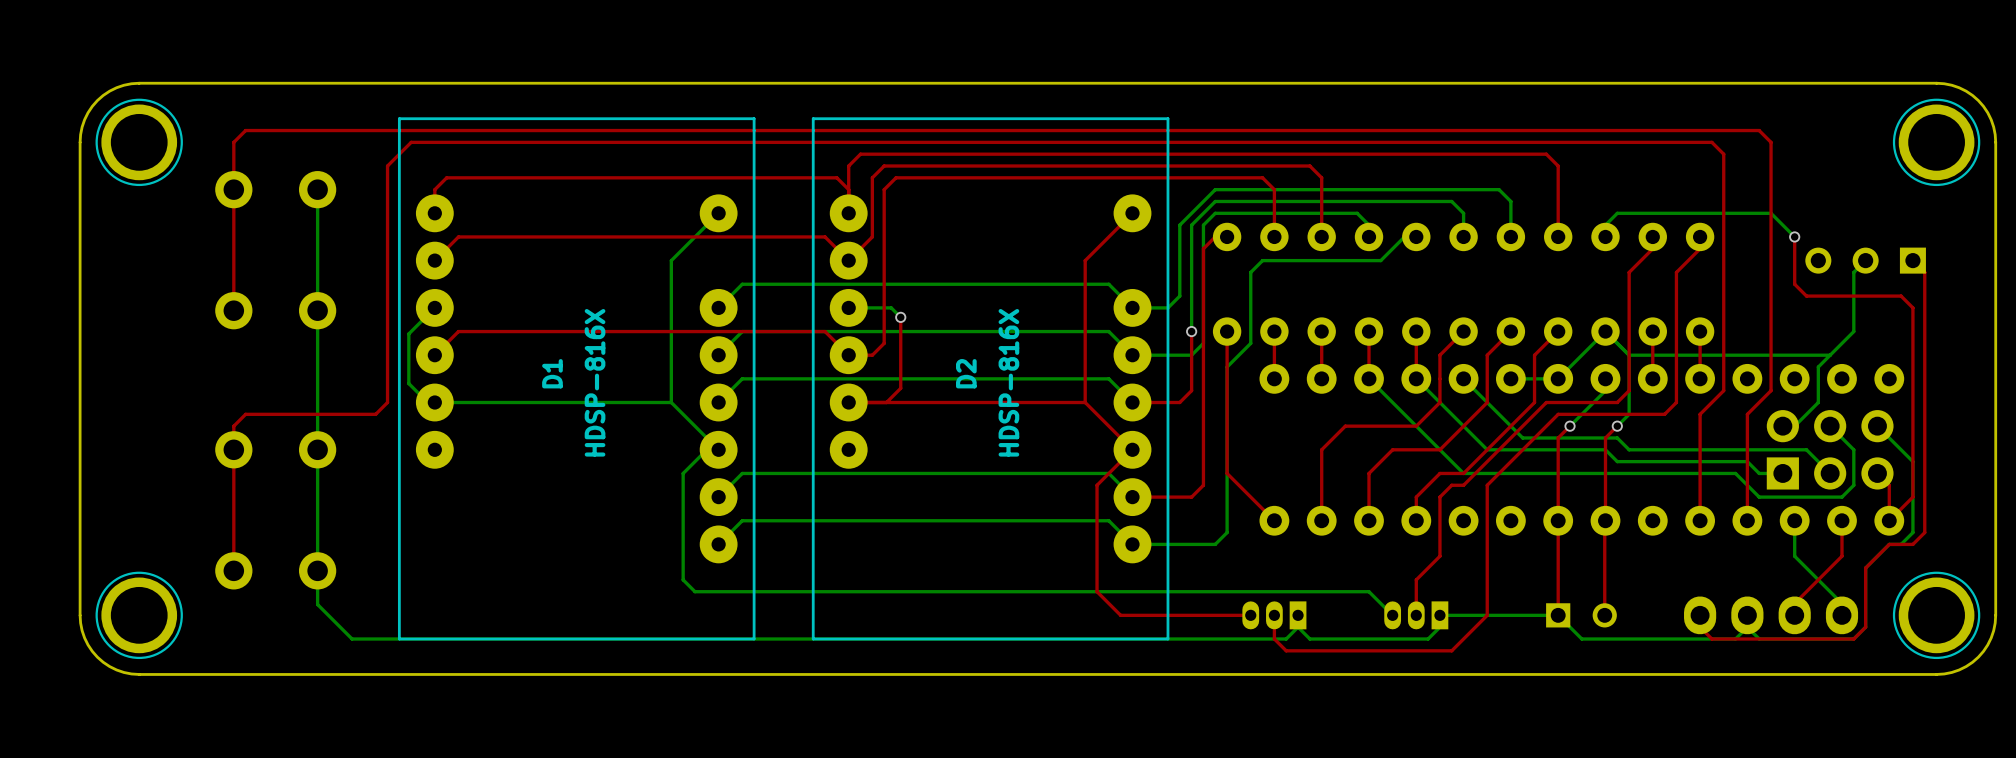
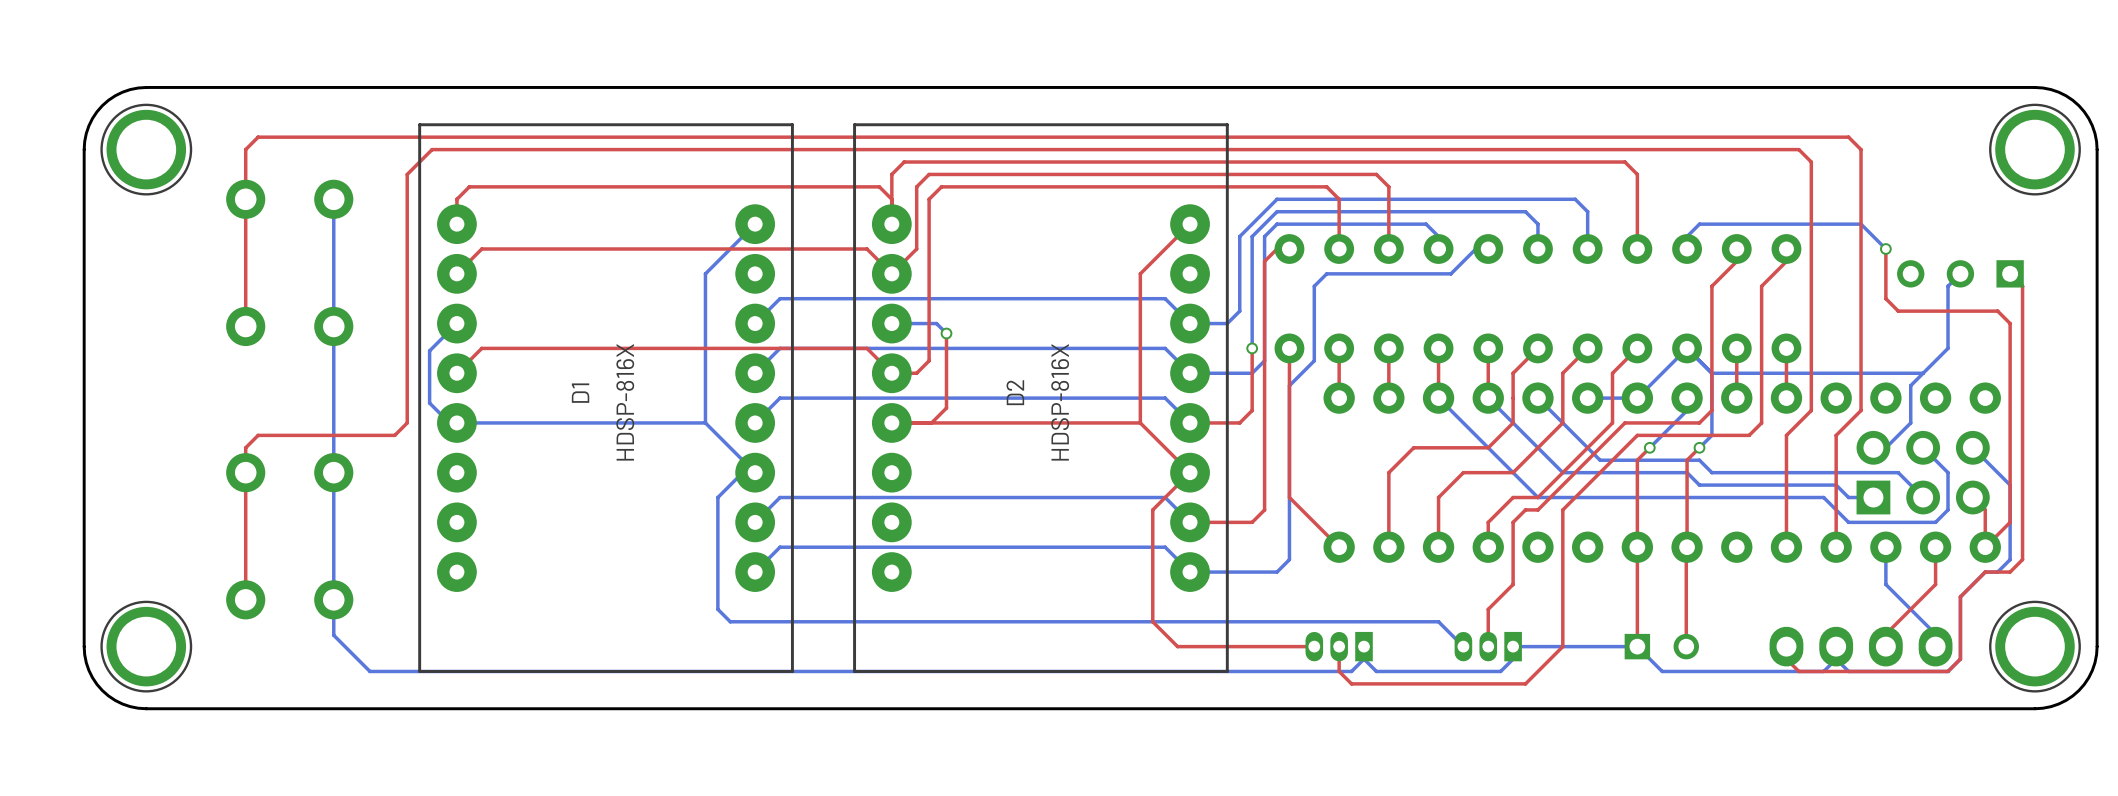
D1 footprint: [397, 117, 756, 641] -> [418, 123, 794, 673]
D2 footprint: [811, 117, 1170, 641] -> [853, 123, 1229, 673]

